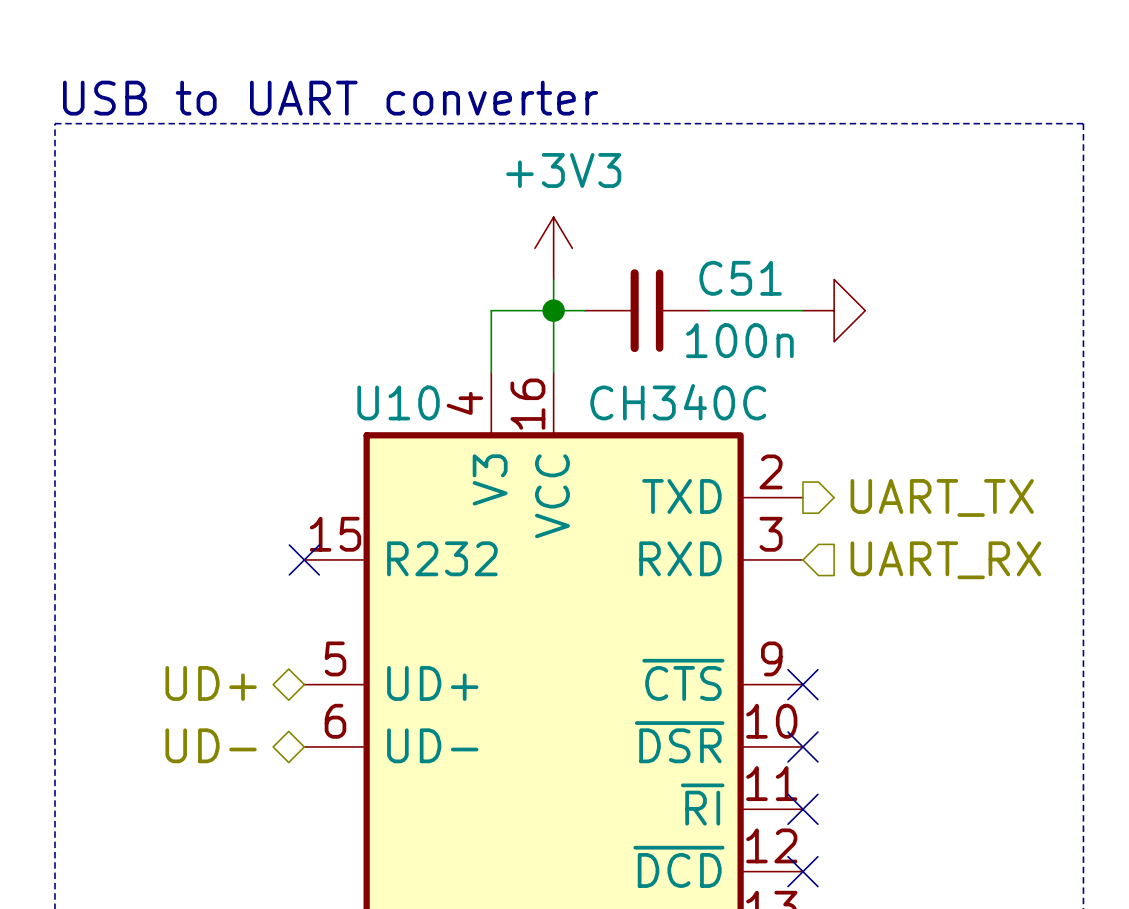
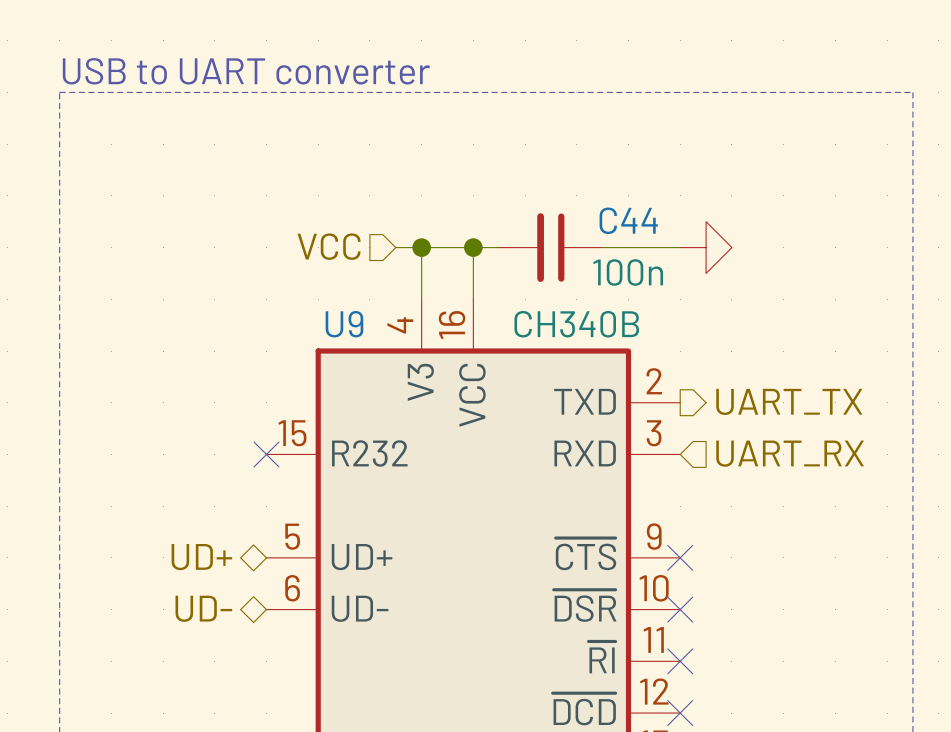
power symbol: +3V3 (553, 248) -> none
C51 name: C51 (740, 278) -> C44 (628, 220)
wire: (553, 279) (553, 310) -> none
hierarchical label: none -> VCC (329, 246)
wire: none -> (395, 247) (421, 247)
junction: none -> (421, 247)
U10 name: U10 (398, 402) -> U9 (344, 324)
U10 value: CH340C (678, 402) -> CH340B (576, 324)

